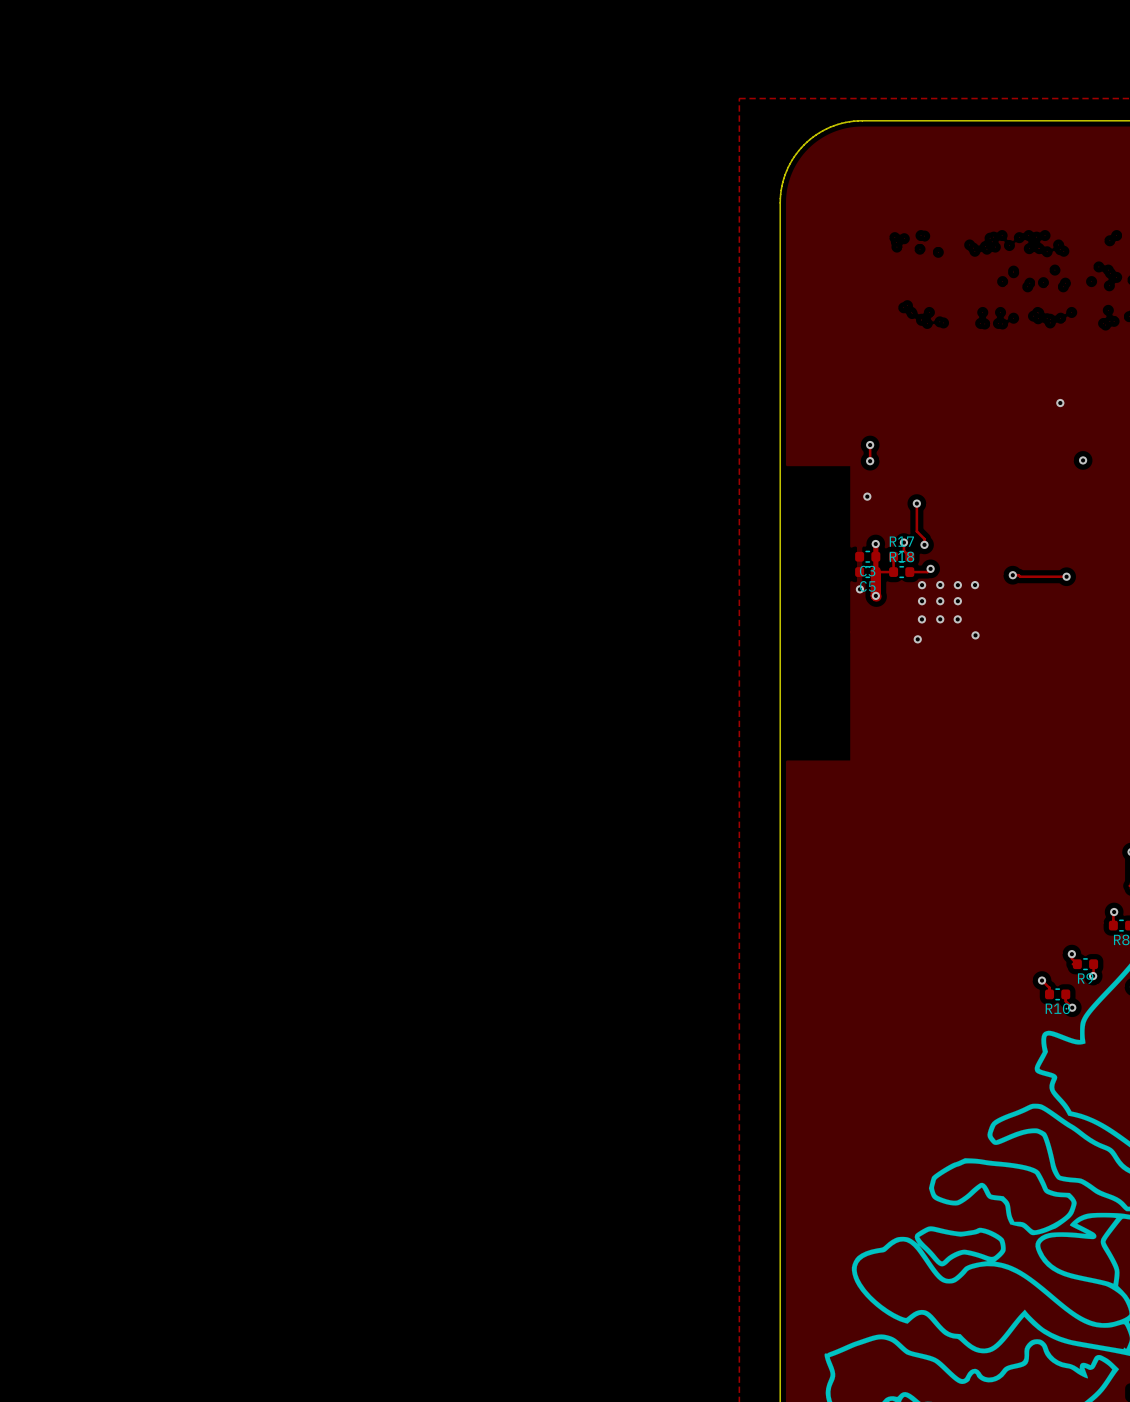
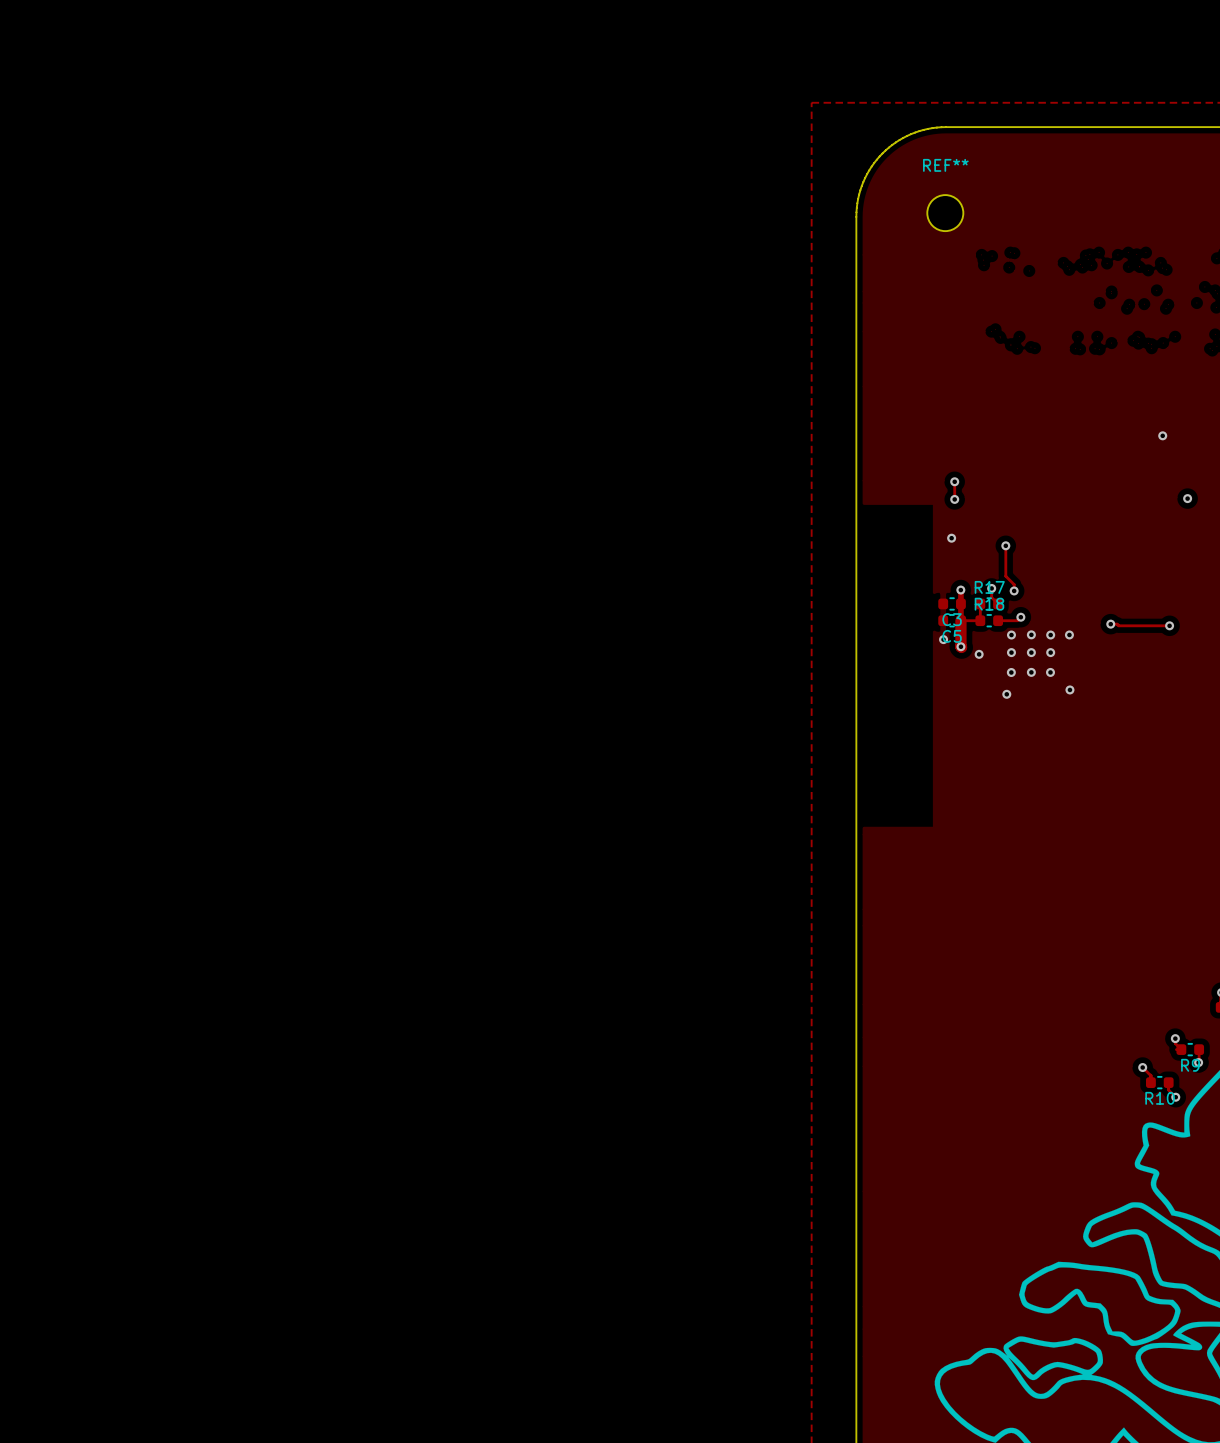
REF**: none -> (945, 213)
via: none -> (979, 654)

